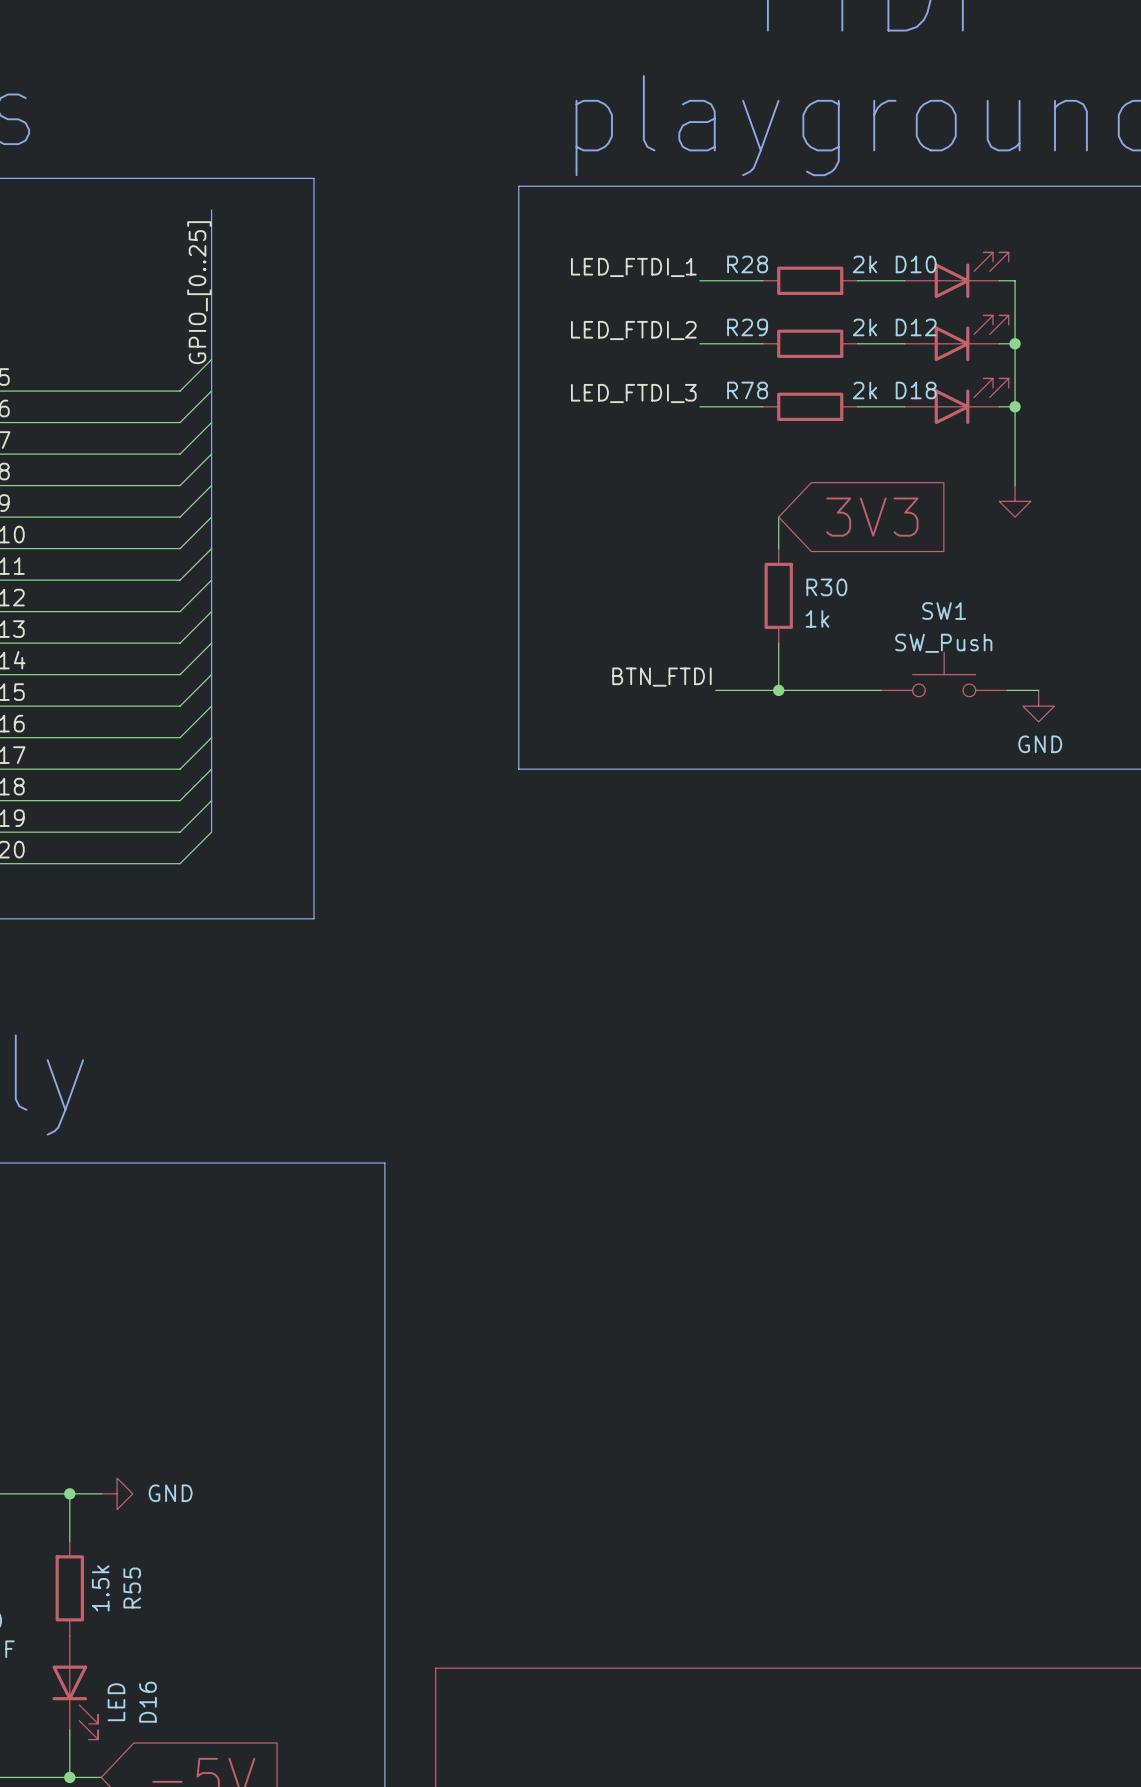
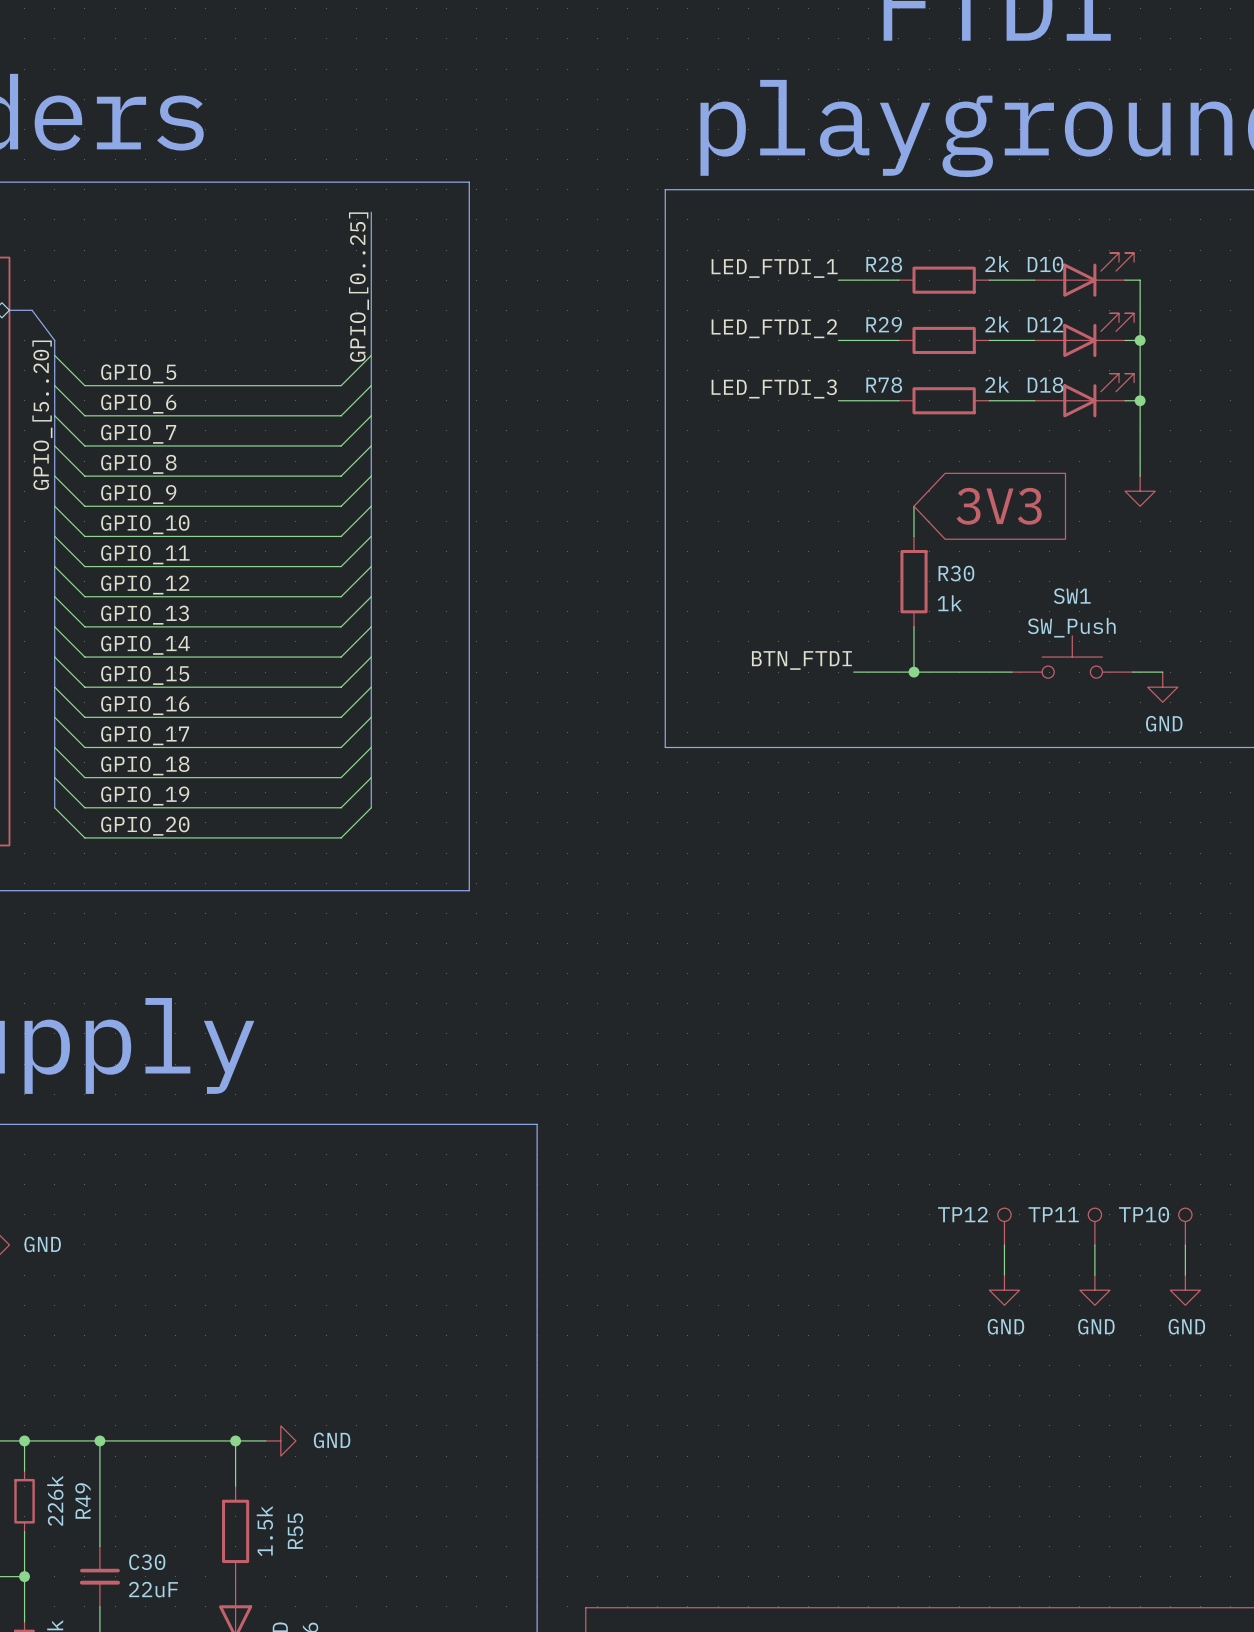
TP12: none -> (1004, 1226)
TP11: none -> (1094, 1226)
TP10: none -> (1185, 1226)
wire: none -> (1004, 1244) (1004, 1275)
wire: none -> (1094, 1244) (1094, 1275)
wire: none -> (1185, 1244) (1185, 1275)
power symbol: none -> GND (1004, 1290)
power symbol: none -> GND (1094, 1290)
power symbol: none -> GND (1185, 1290)

